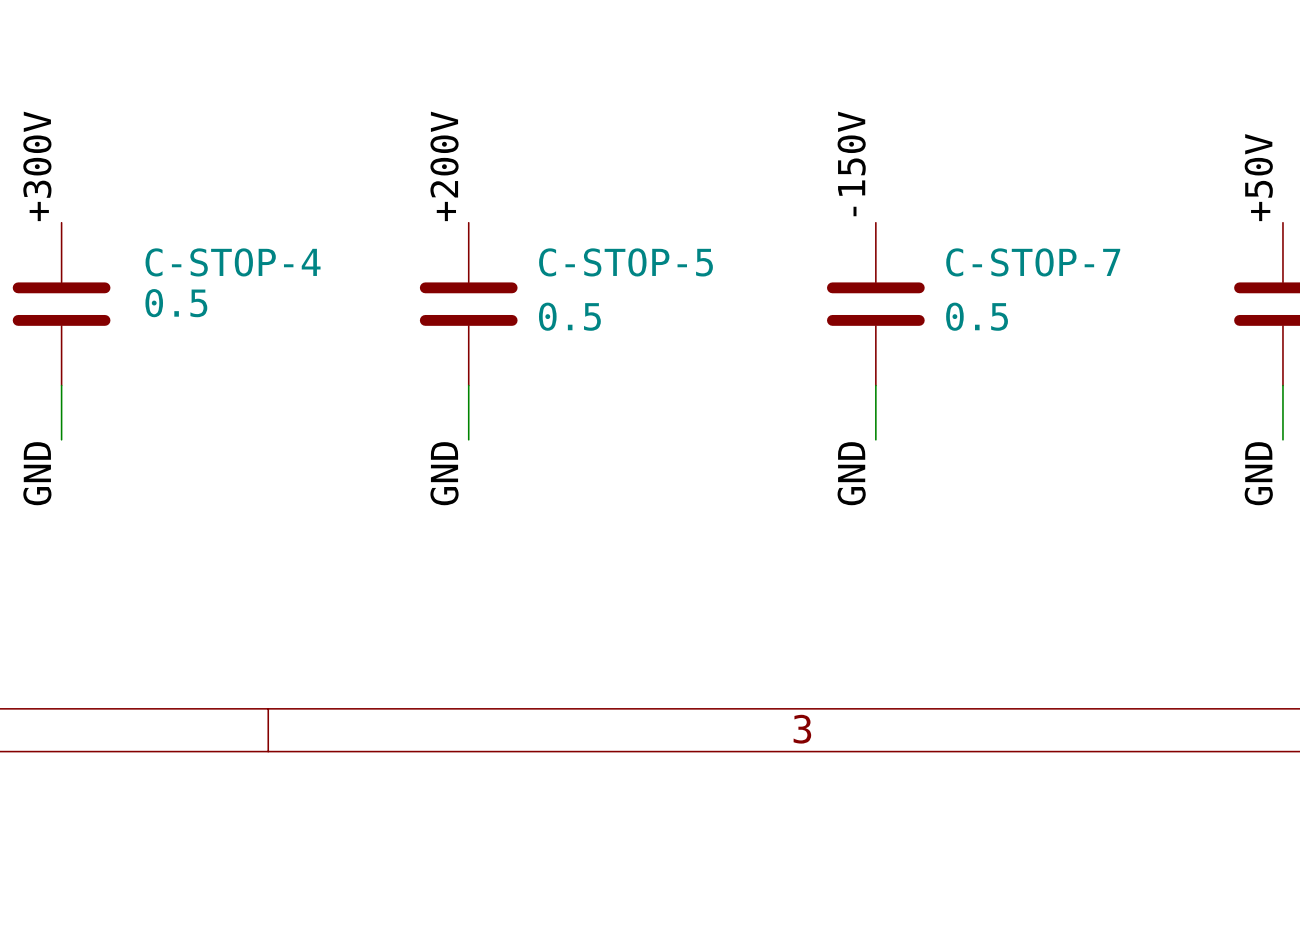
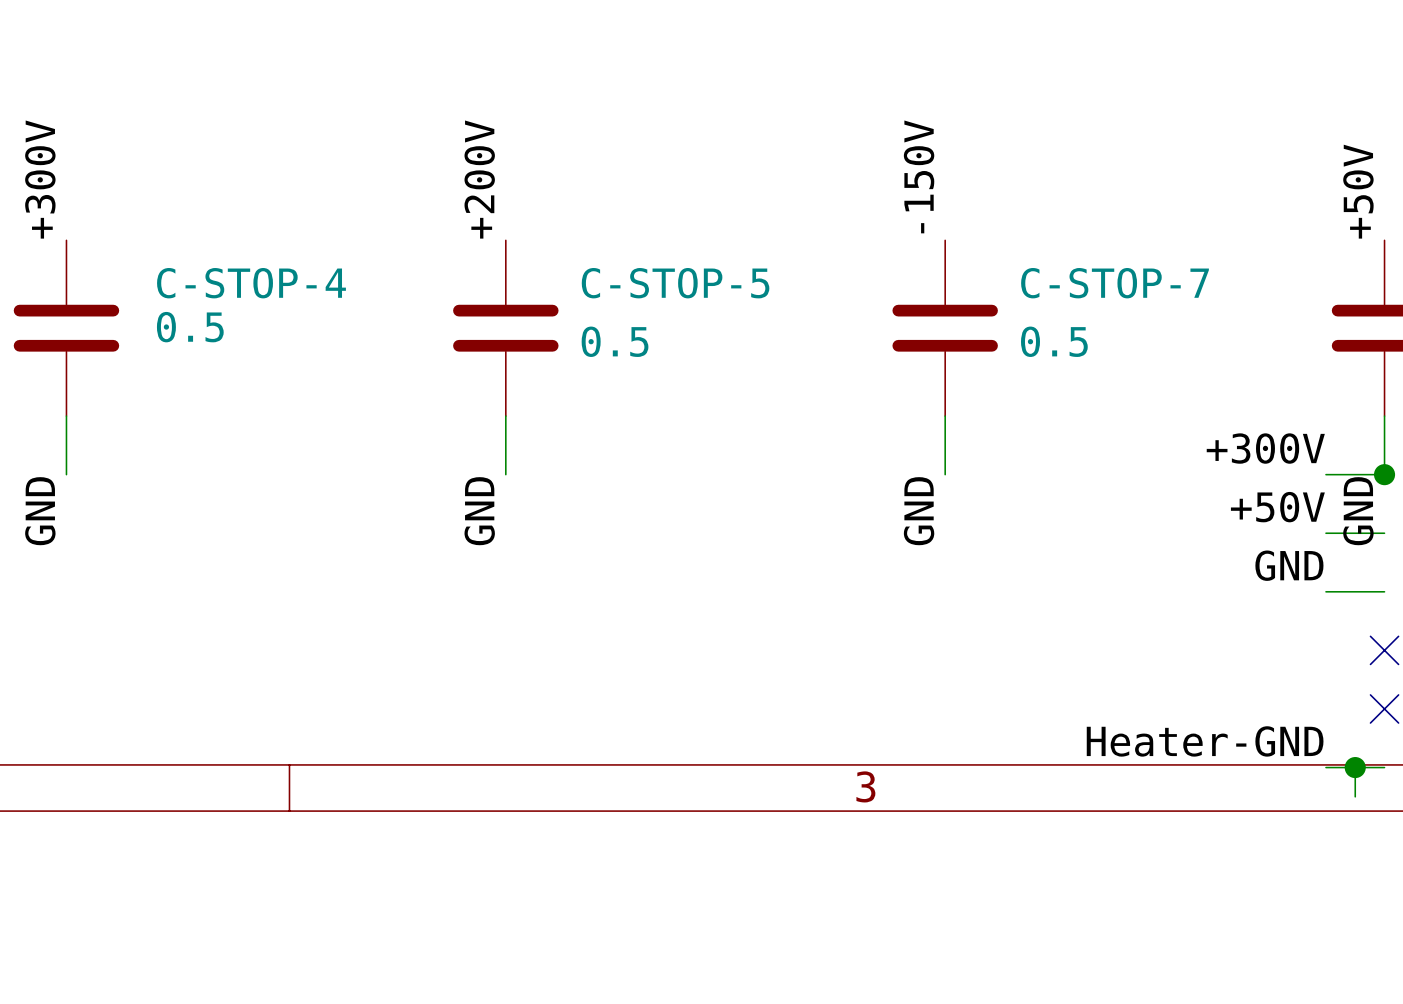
label: none -> +300V (1265, 448)
wire: none -> (1325, 474) (1384, 474)
junction: none -> (1384, 474)
label: none -> +50V (1277, 507)
wire: none -> (1325, 533) (1384, 533)
label: none -> GND (1289, 565)
wire: none -> (1325, 591) (1384, 591)
no-connect mark: none -> (1384, 650)
no-connect mark: none -> (1384, 708)
label: none -> Heater-GND (1205, 741)
wire: none -> (1325, 767) (1384, 767)
wire: none -> (1355, 767) (1355, 796)
junction: none -> (1355, 767)

